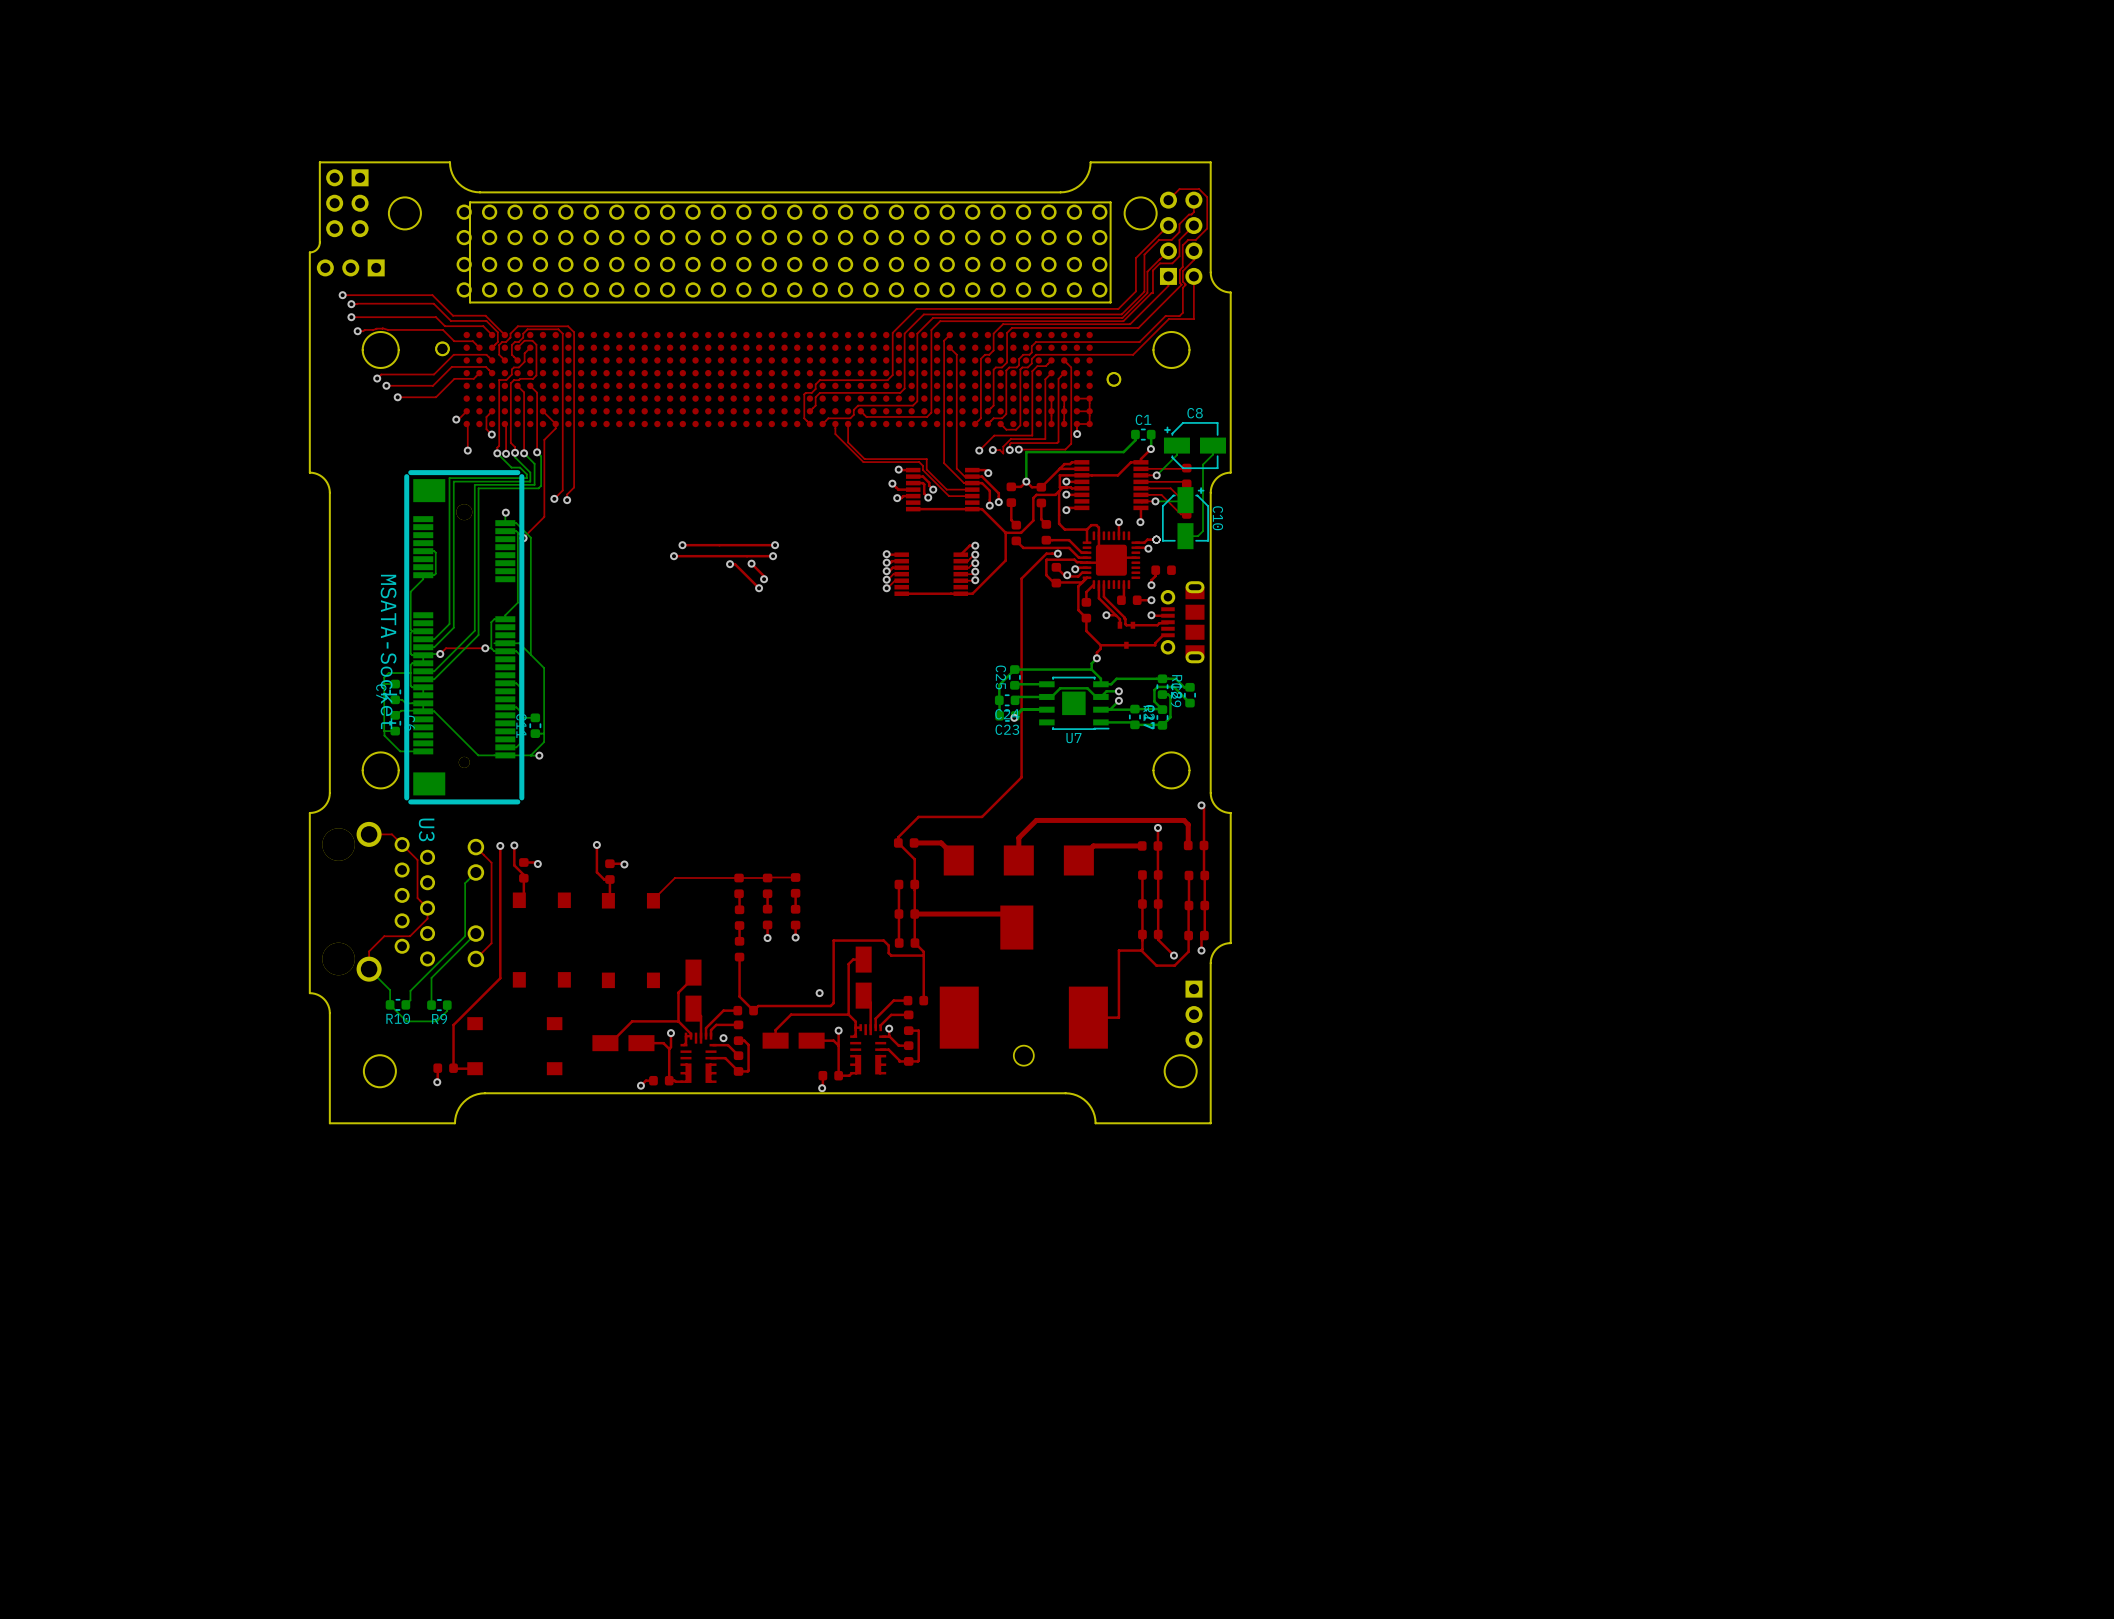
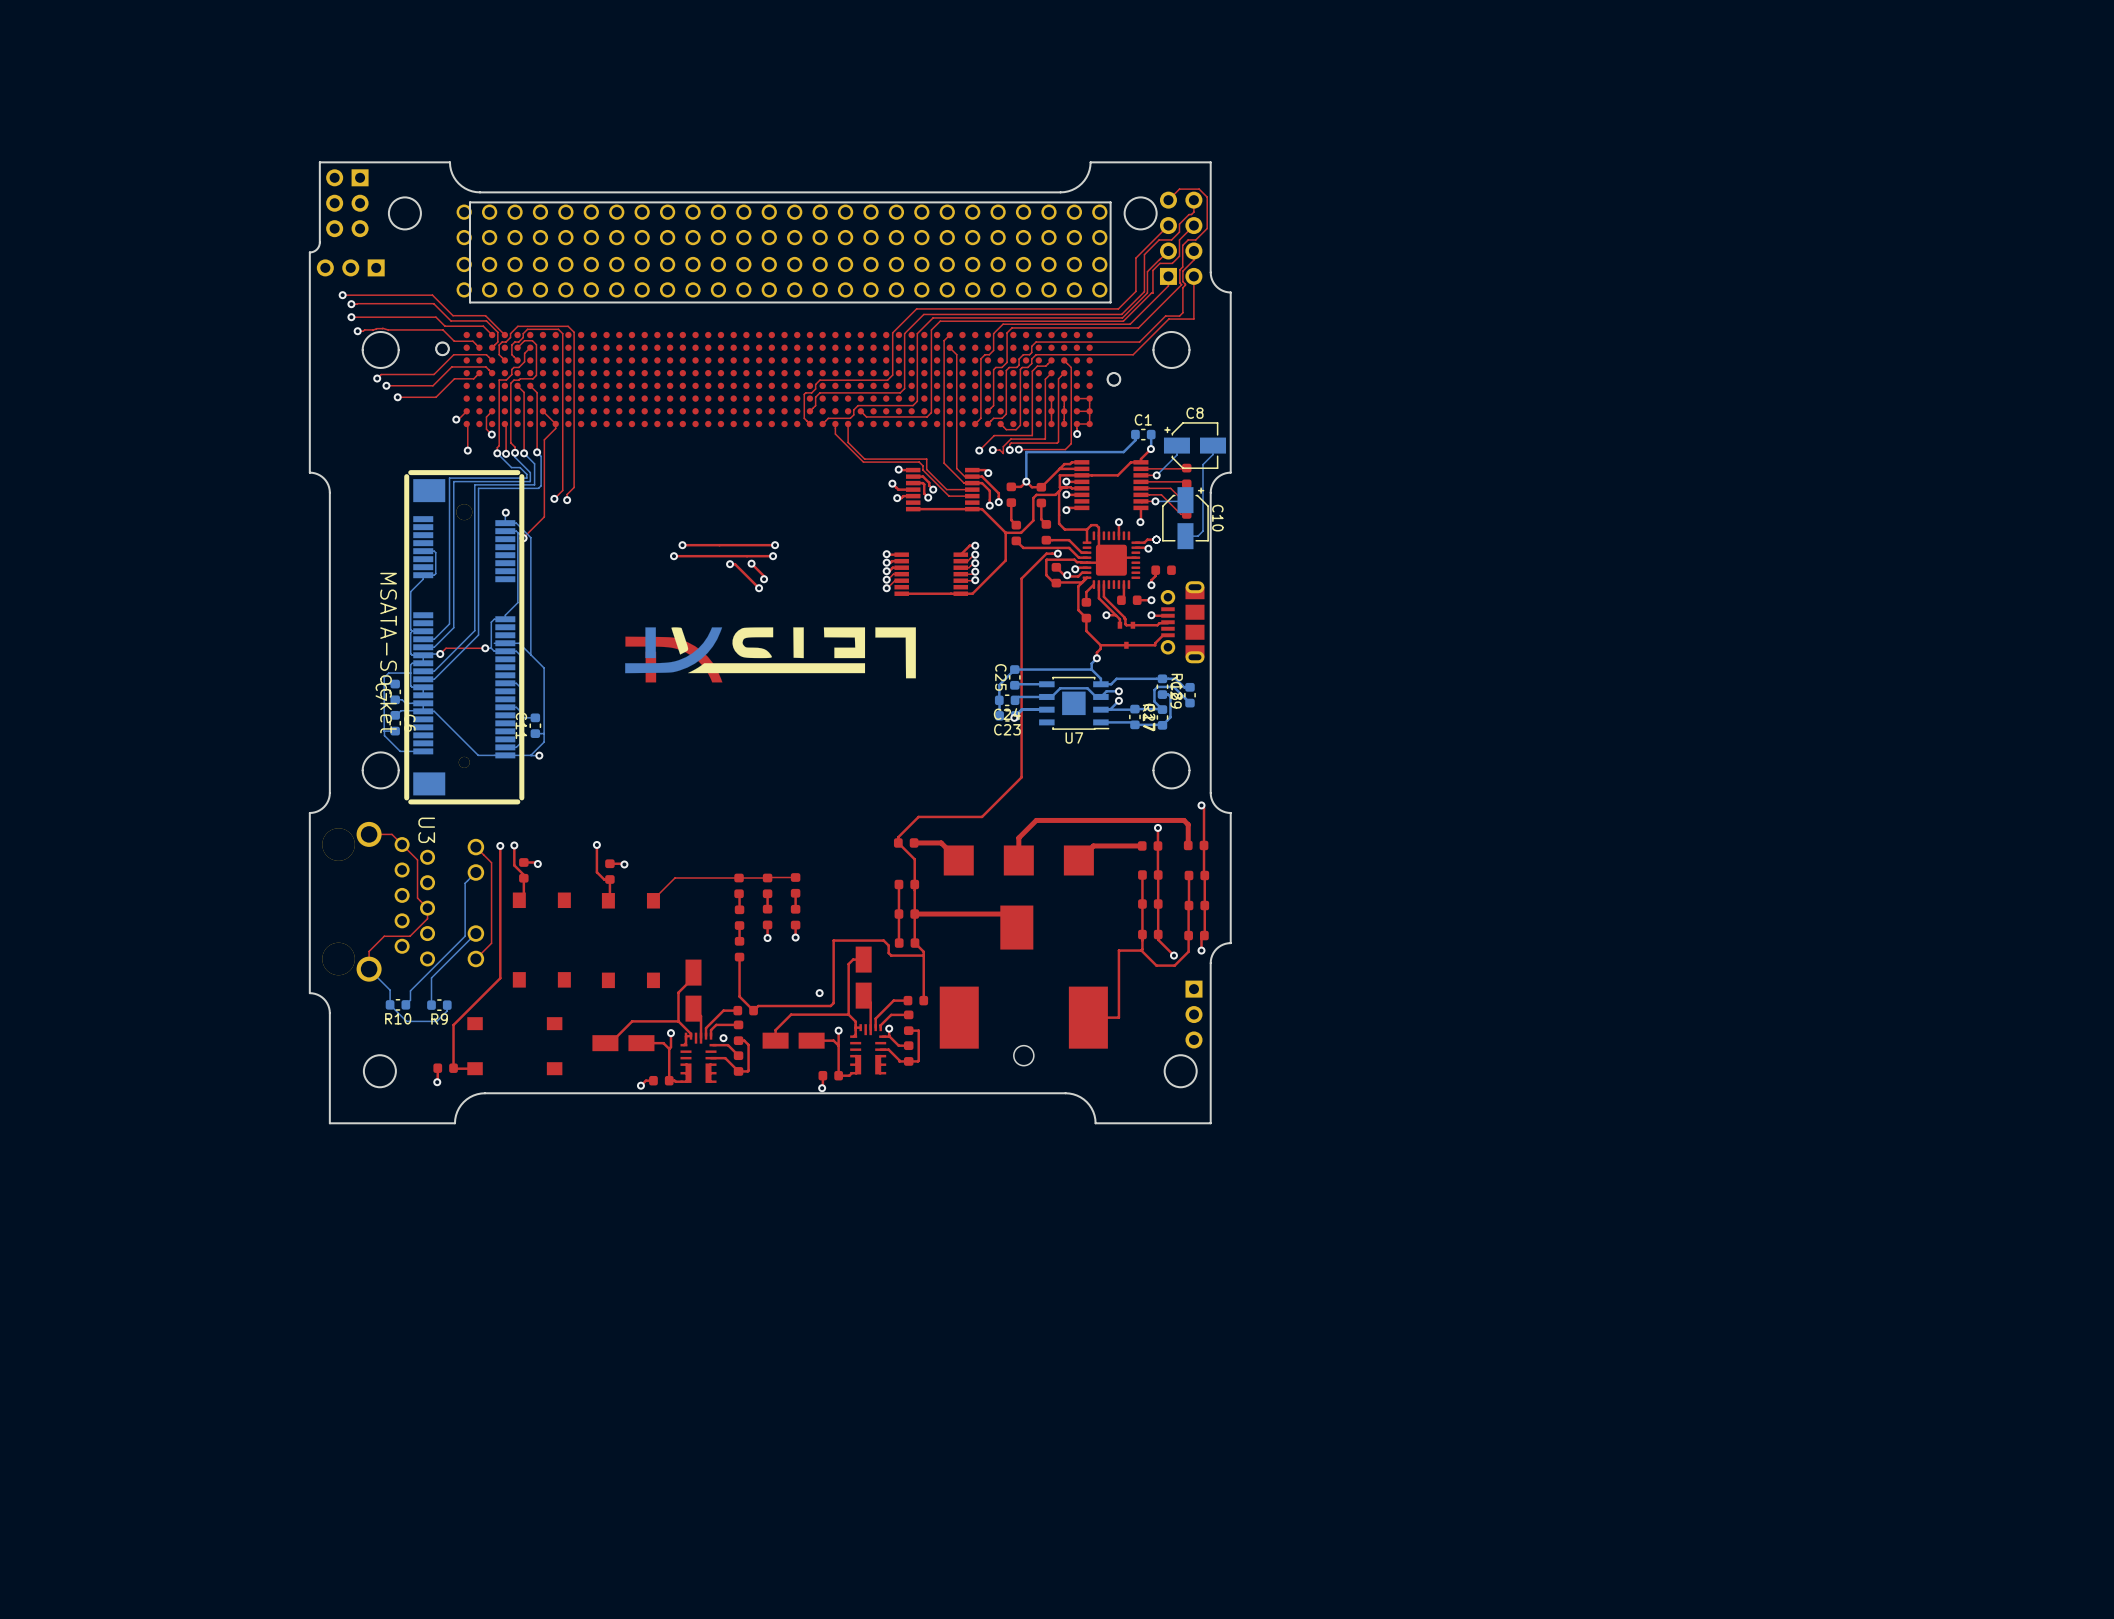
drawing: none -> [625, 627, 916, 683]

